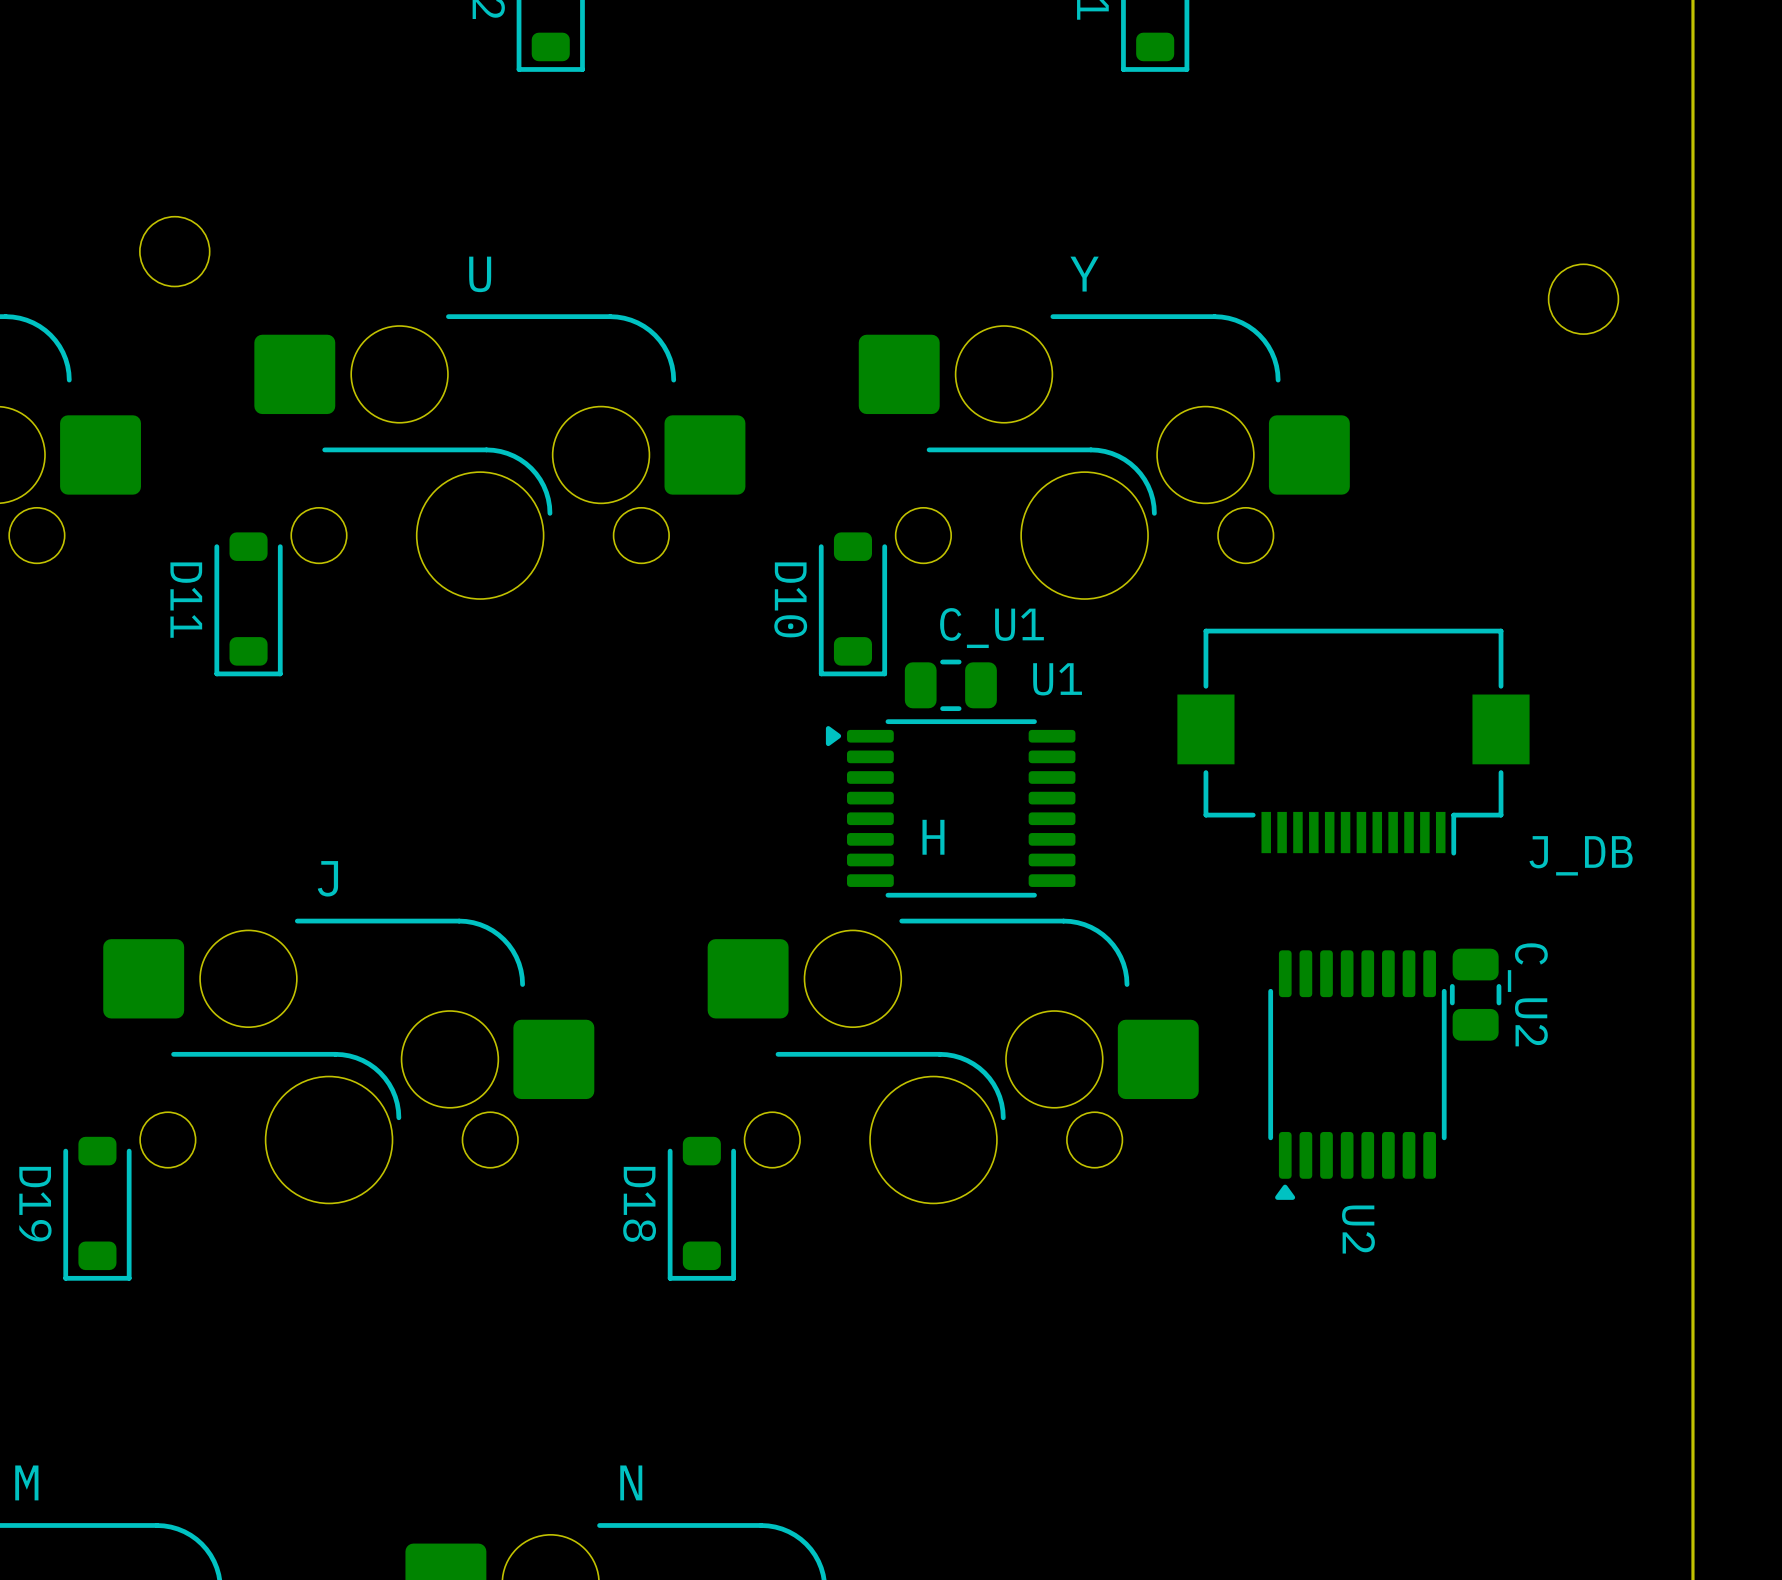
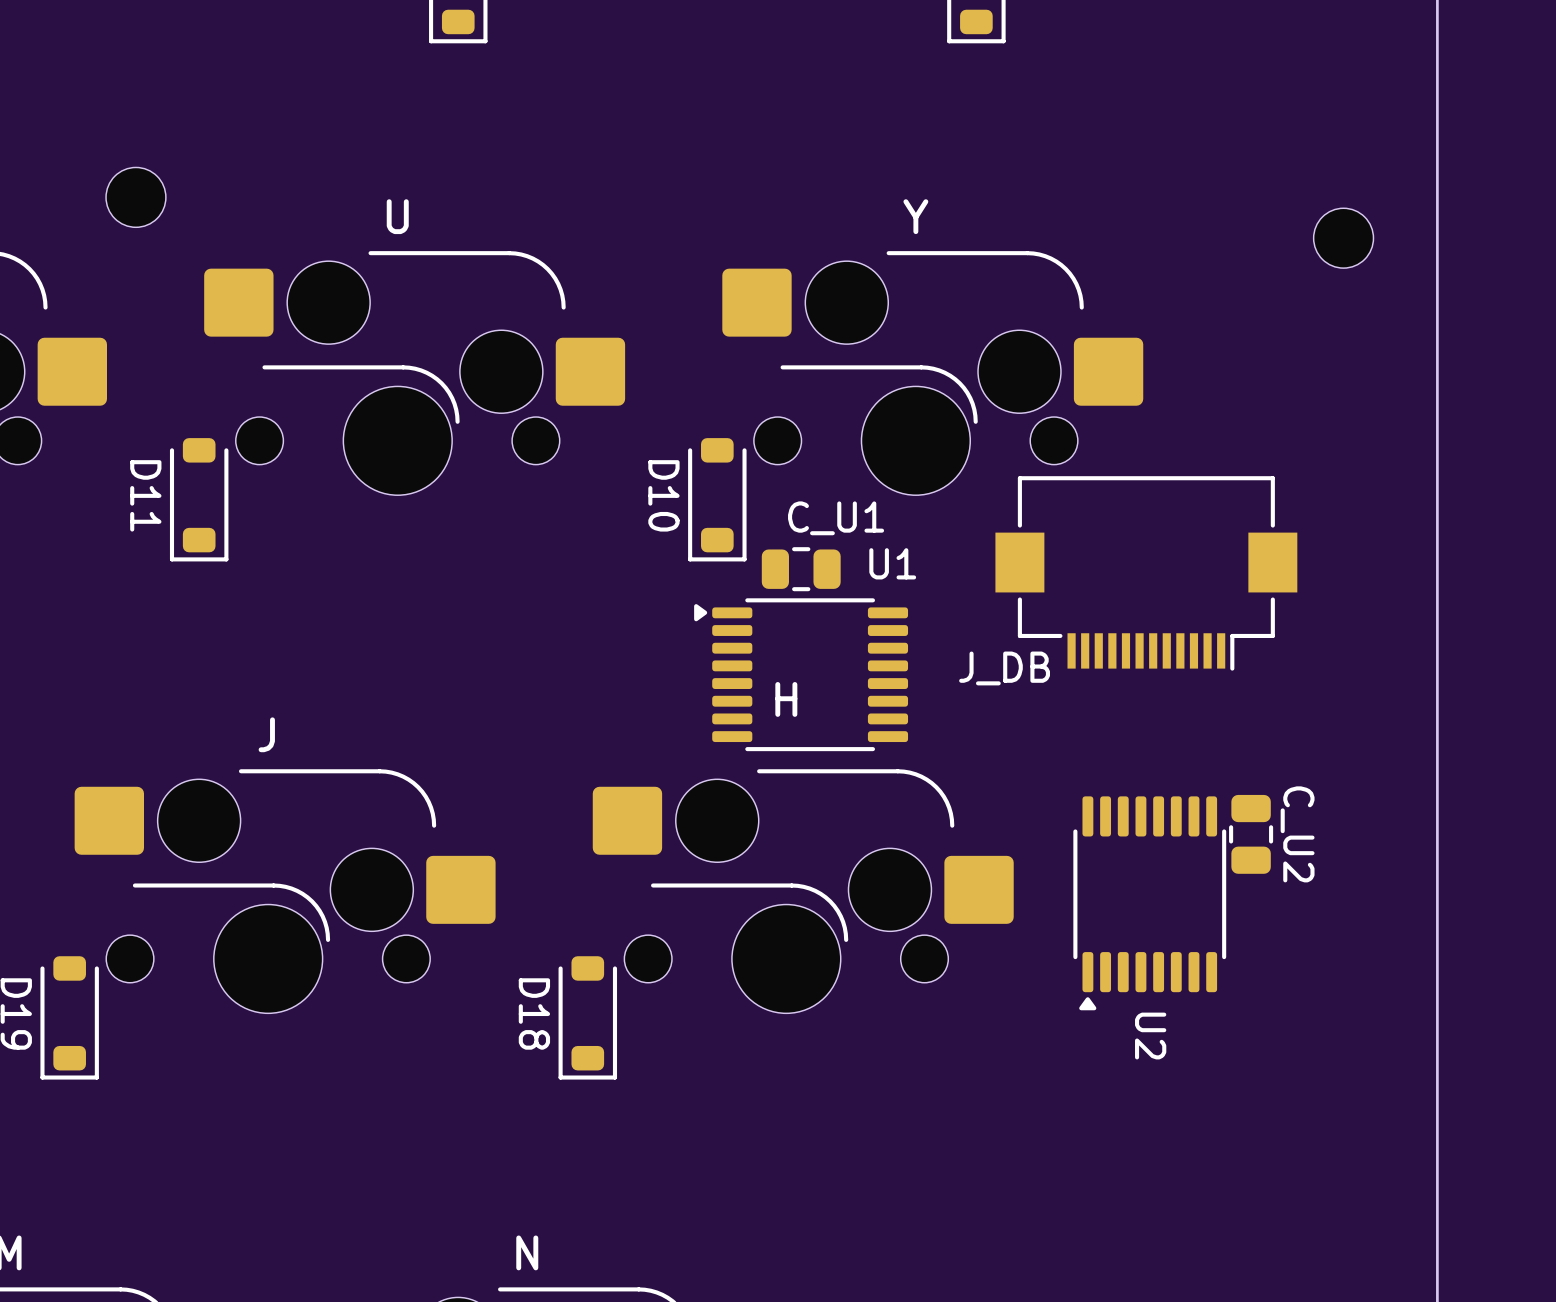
J_DB position: (1353, 742) -> (1146, 573)
J_DB name position: J_DB (1581, 855) -> J_DB (1004, 668)

